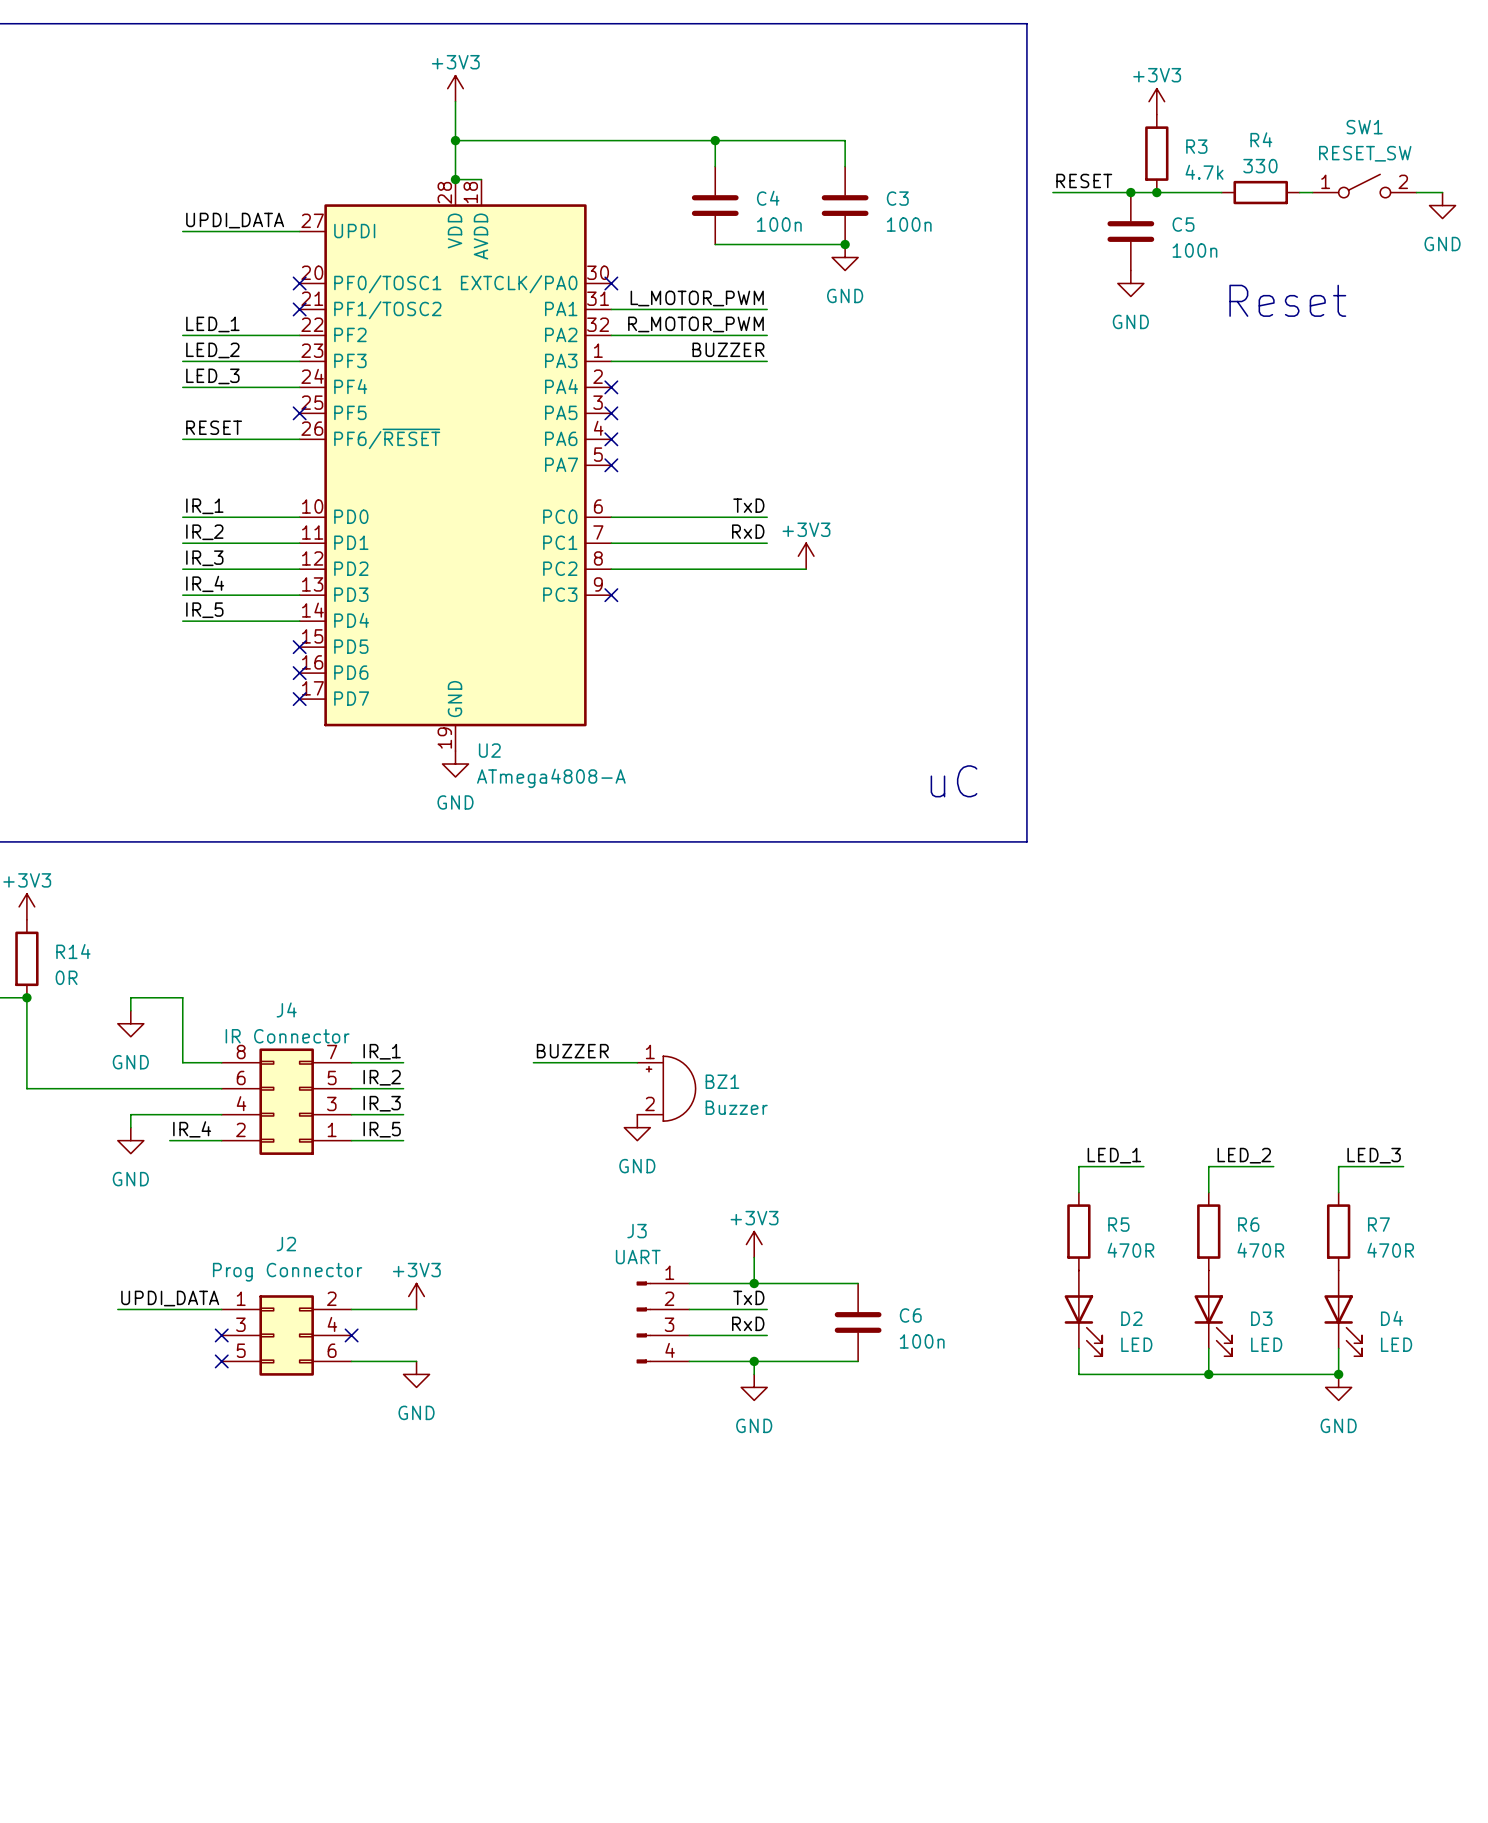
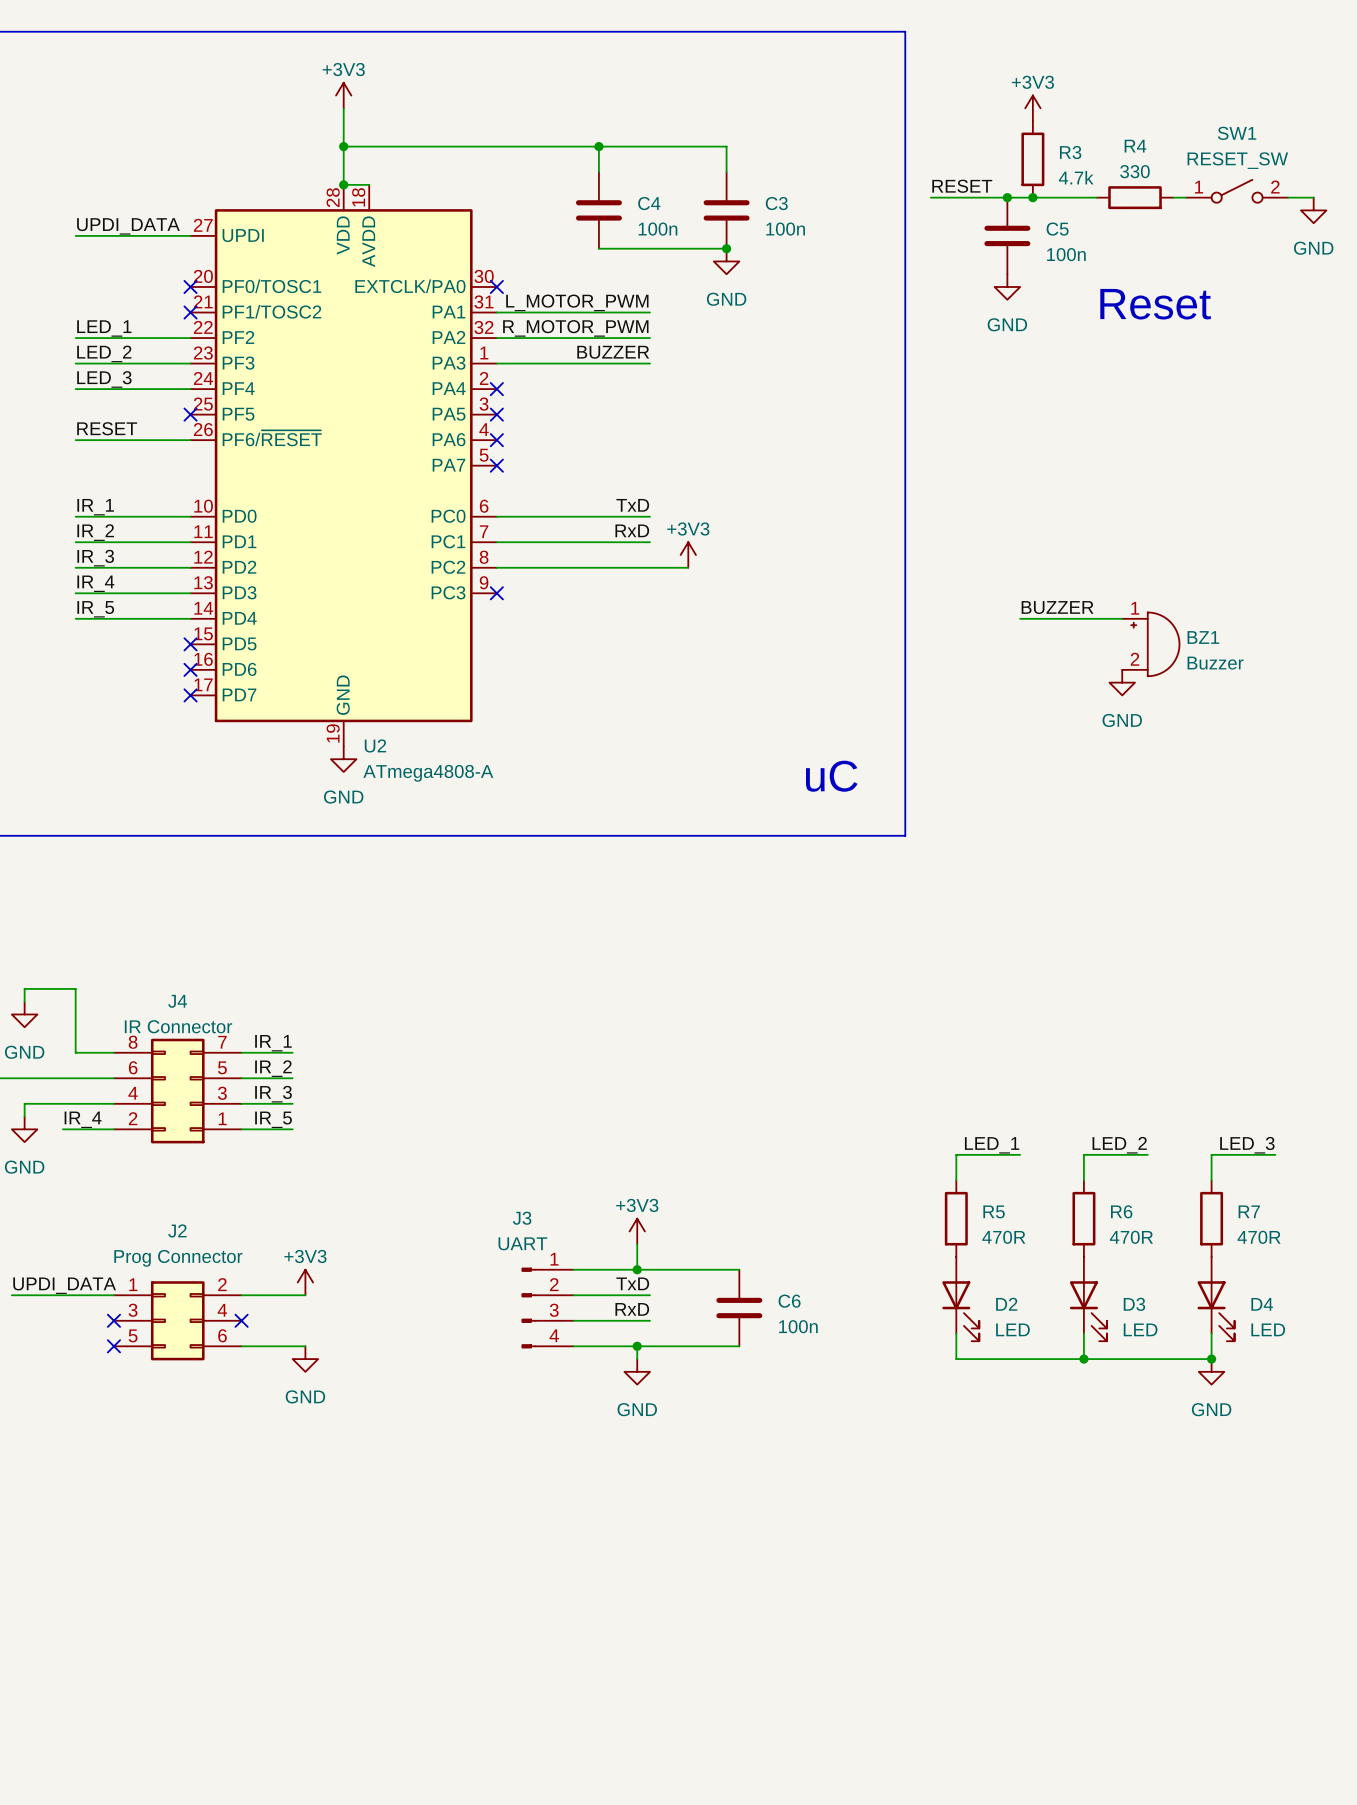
label: none -> BUZZER (1057, 607)
wire: none -> (1020, 618) (1122, 618)
power symbol: none -> GND (1122, 682)
label: BUZZER (572, 1051) -> none
wire: (533, 1062) (637, 1062) -> none
BZ1 position: (666, 1088) -> (1150, 644)
power symbol: GND (637, 1127) -> none

